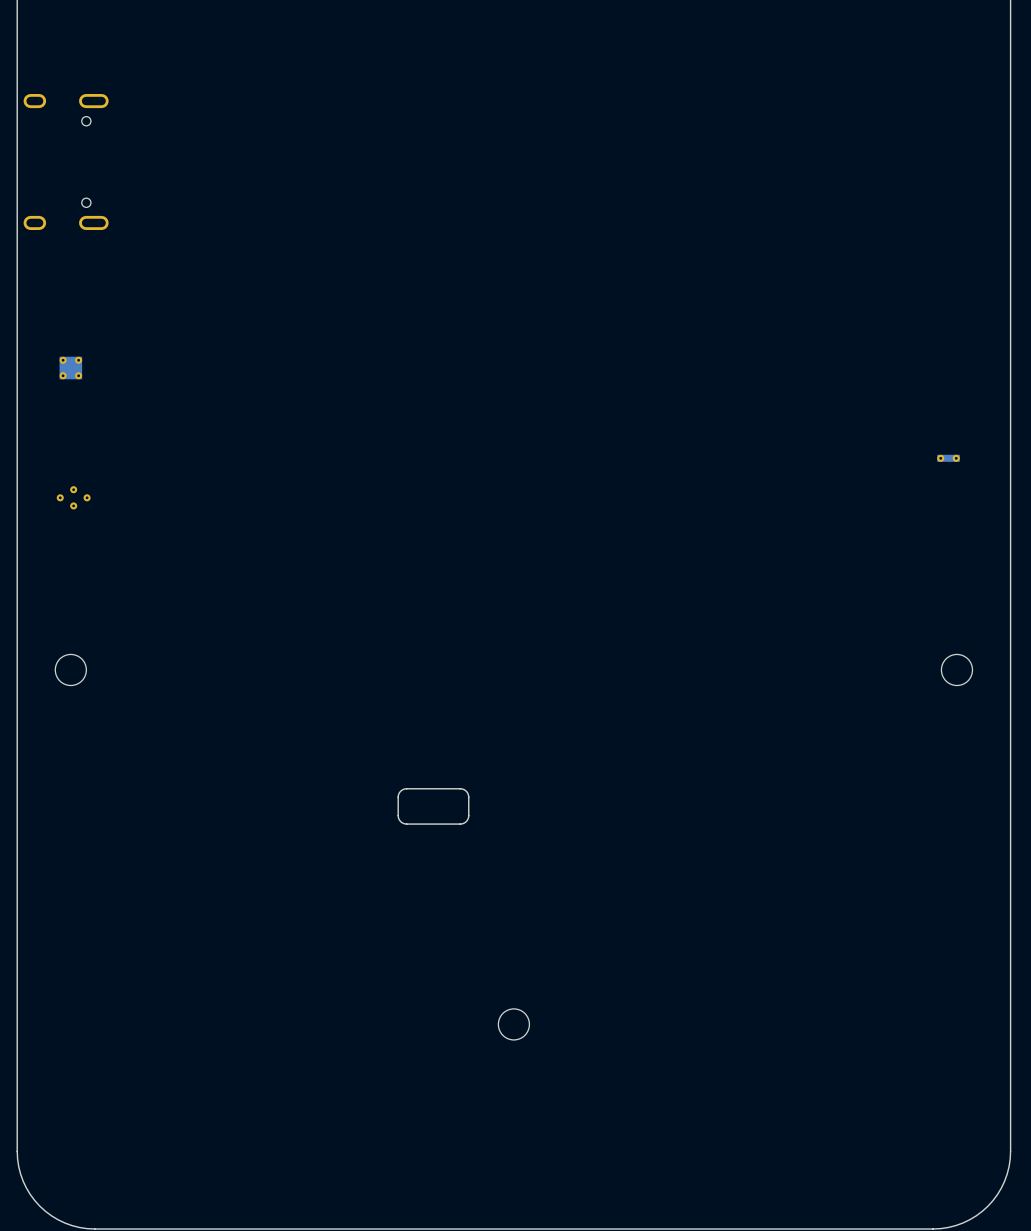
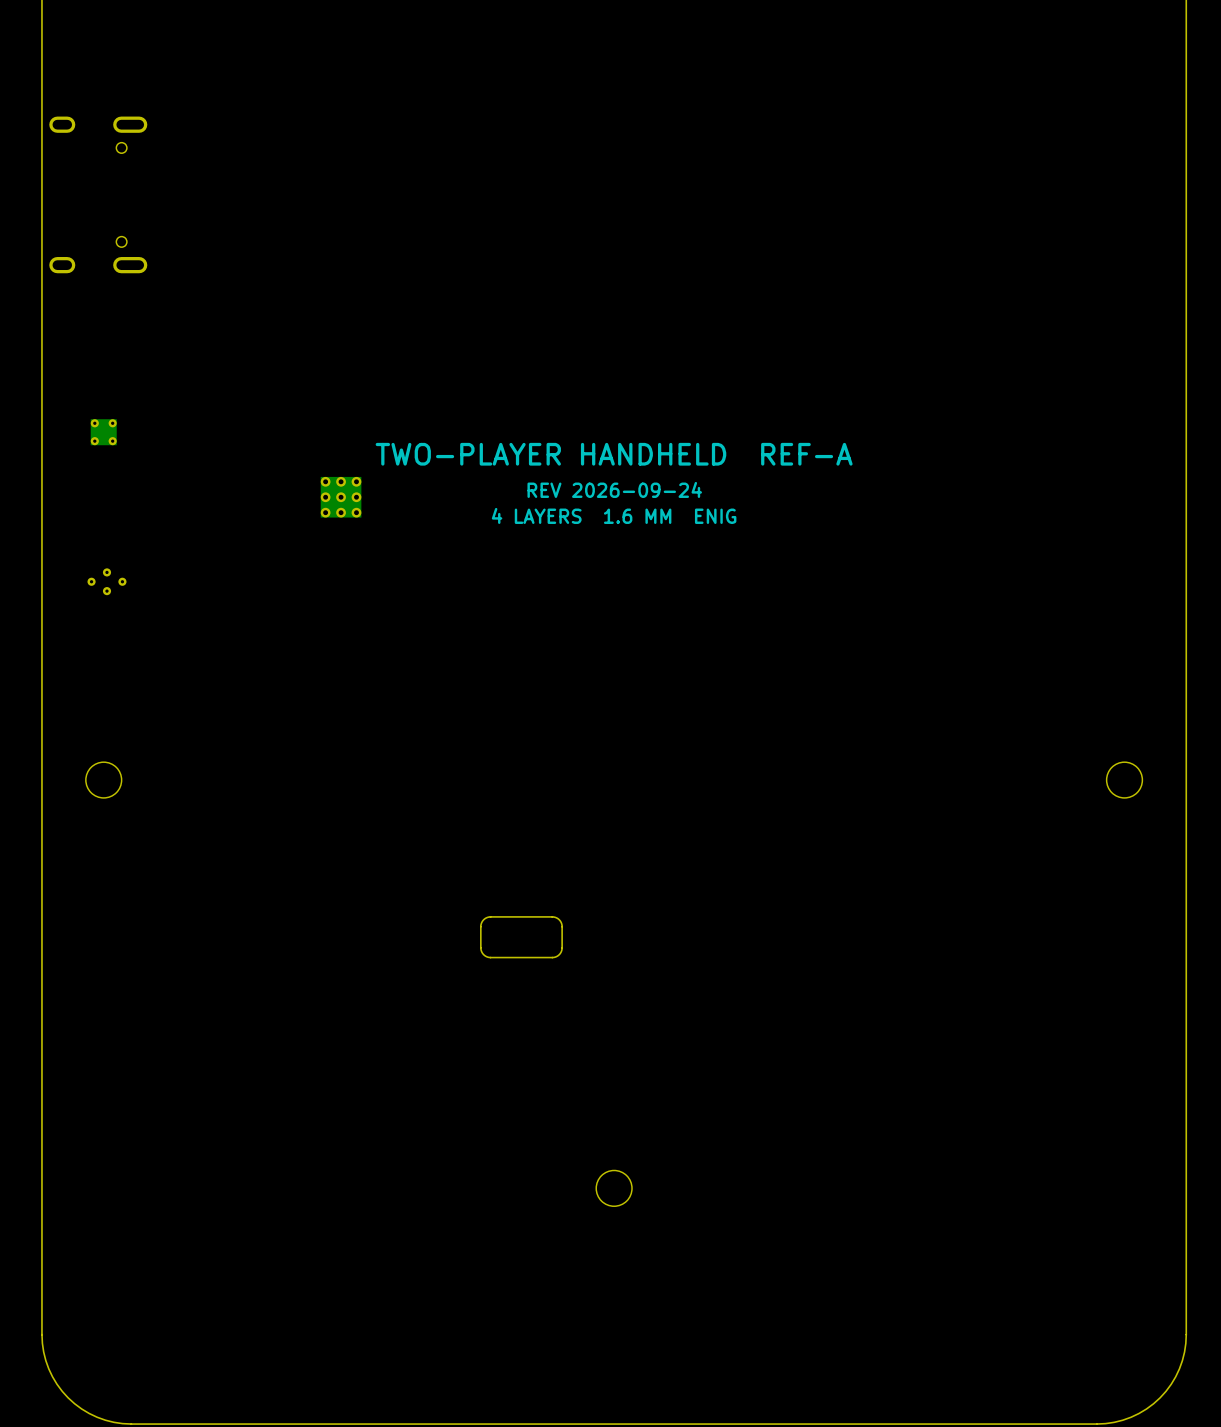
text: none -> TWO-PLAYER HANDHELD REF-A (614, 454)
text: none -> REV 2026-09-24 (614, 489)
part: none -> (341, 497)
text: none -> 4 LAYERS 1.6 MM ENIG (614, 515)
part: (948, 458) -> none

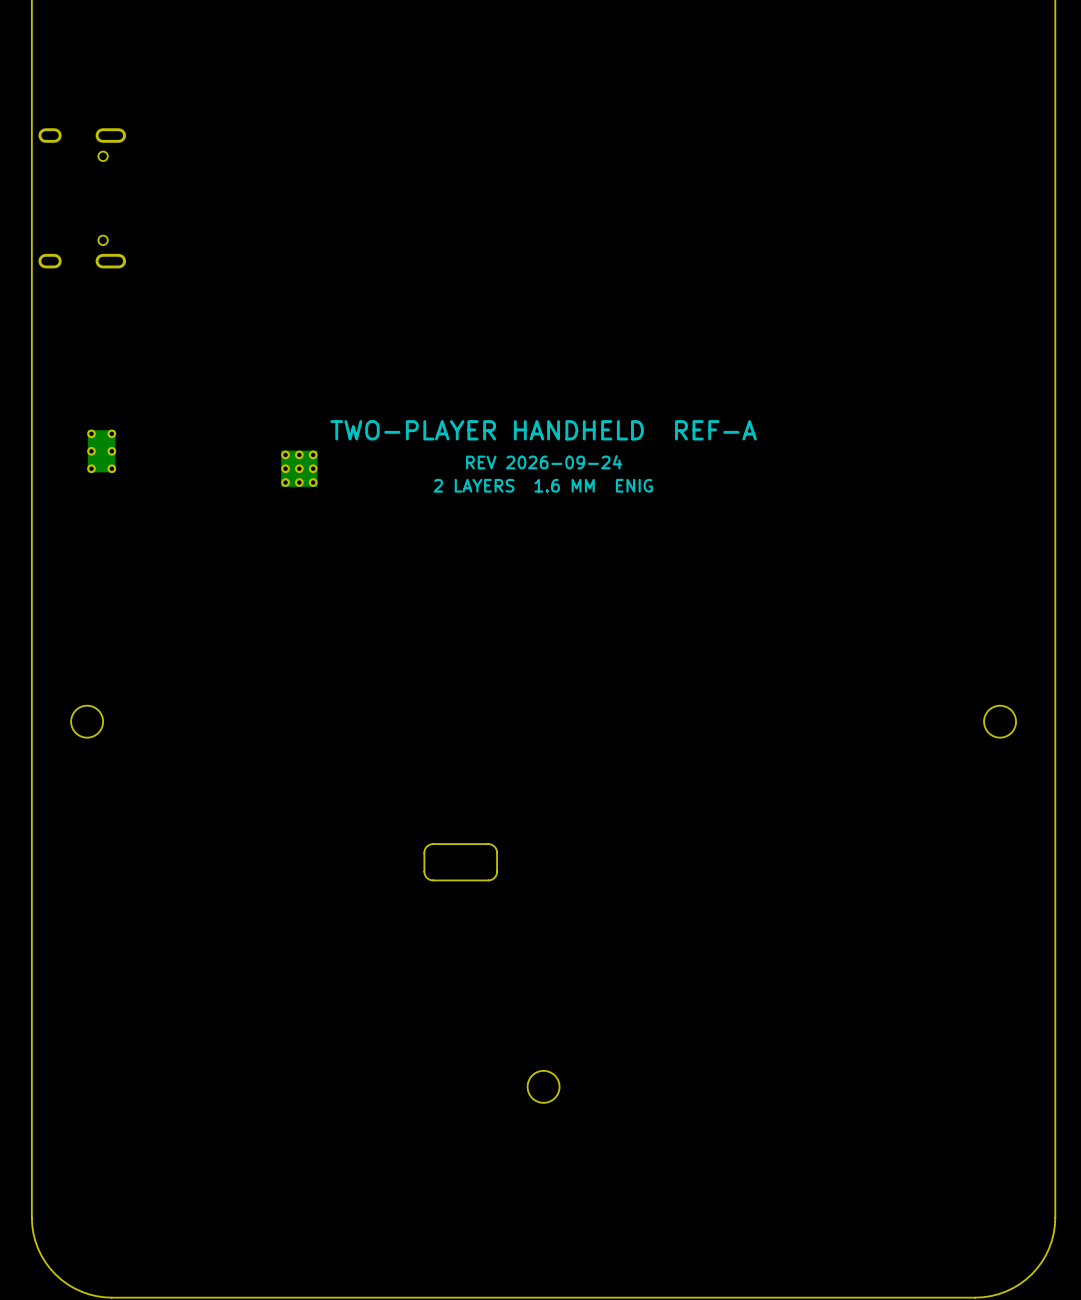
part: (103, 432) -> none
part: none -> (101, 451)
text: 4 LAYERS 1.6 MM ENIG (614, 515) -> 2 LAYERS 1.6 MM ENIG (543, 485)
part: (106, 581) -> none

